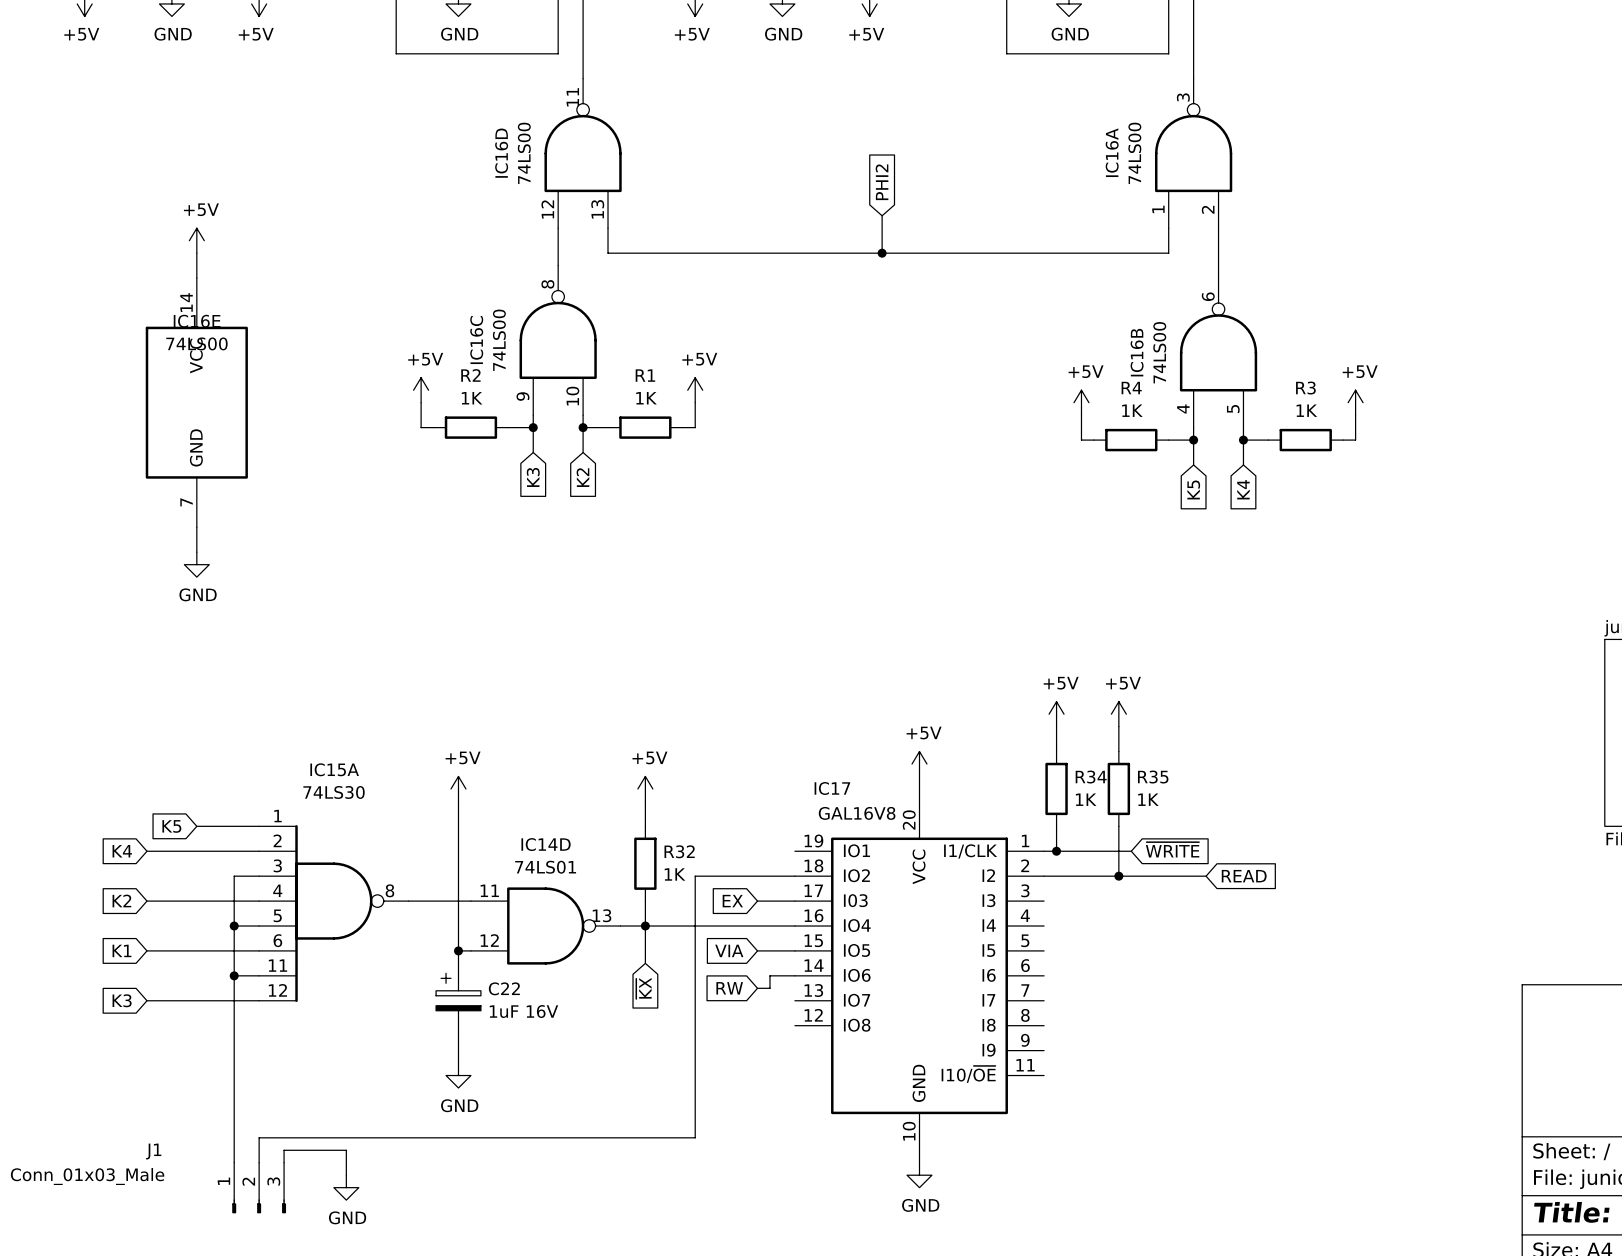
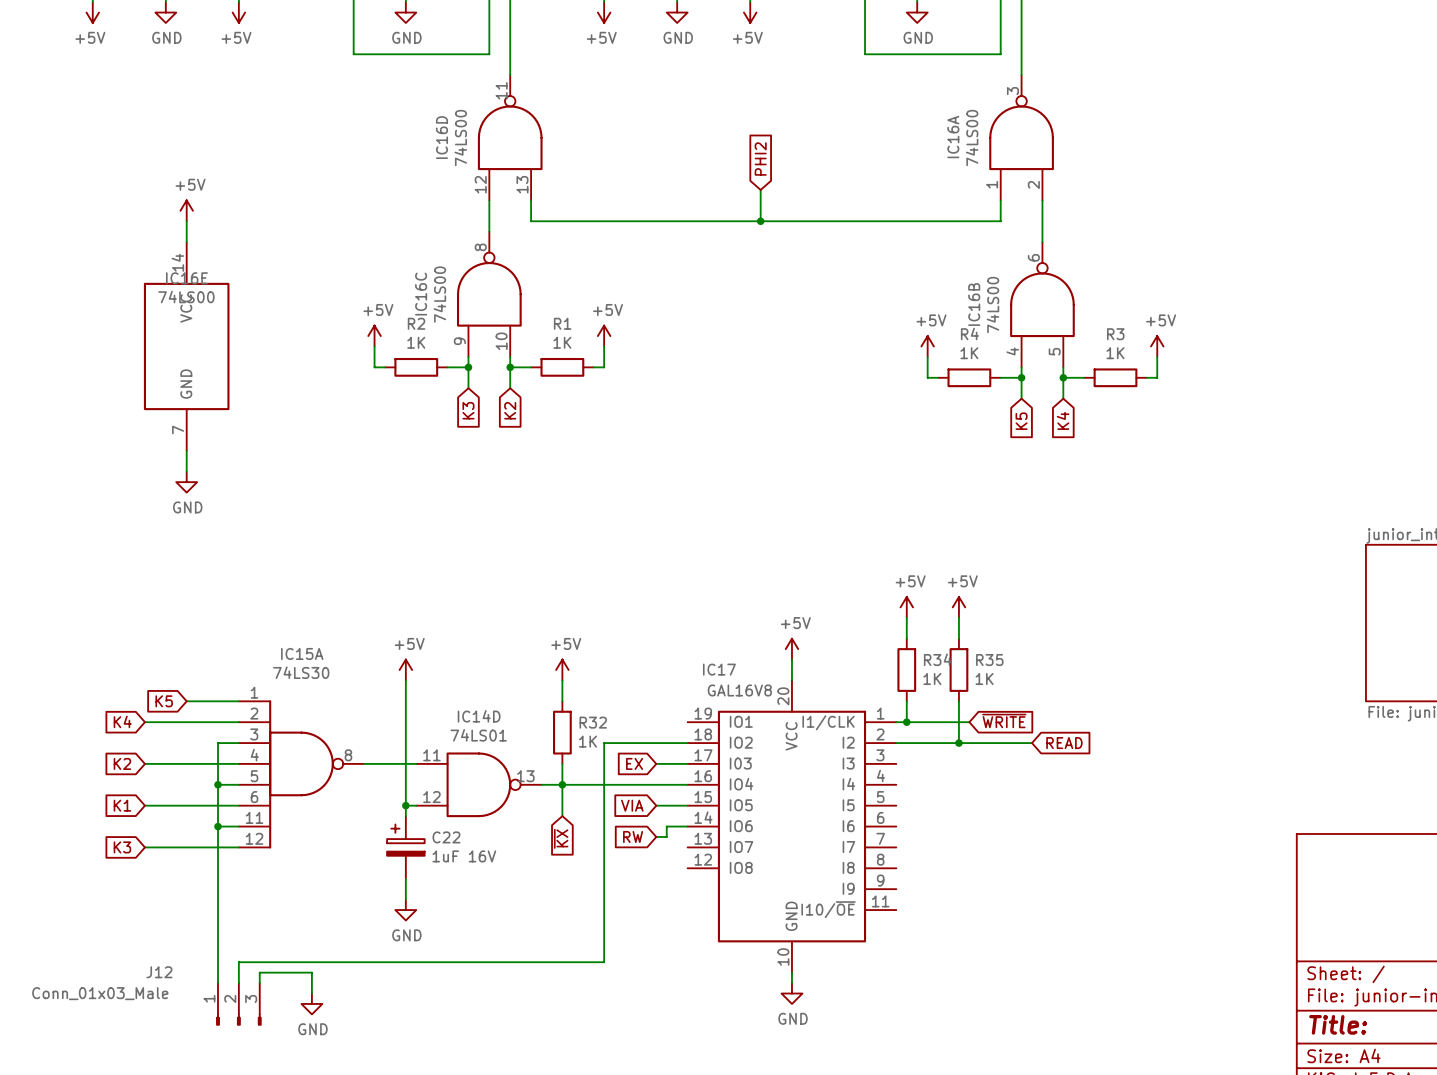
J1 name: J1 (153, 1151) -> J12 (159, 972)

